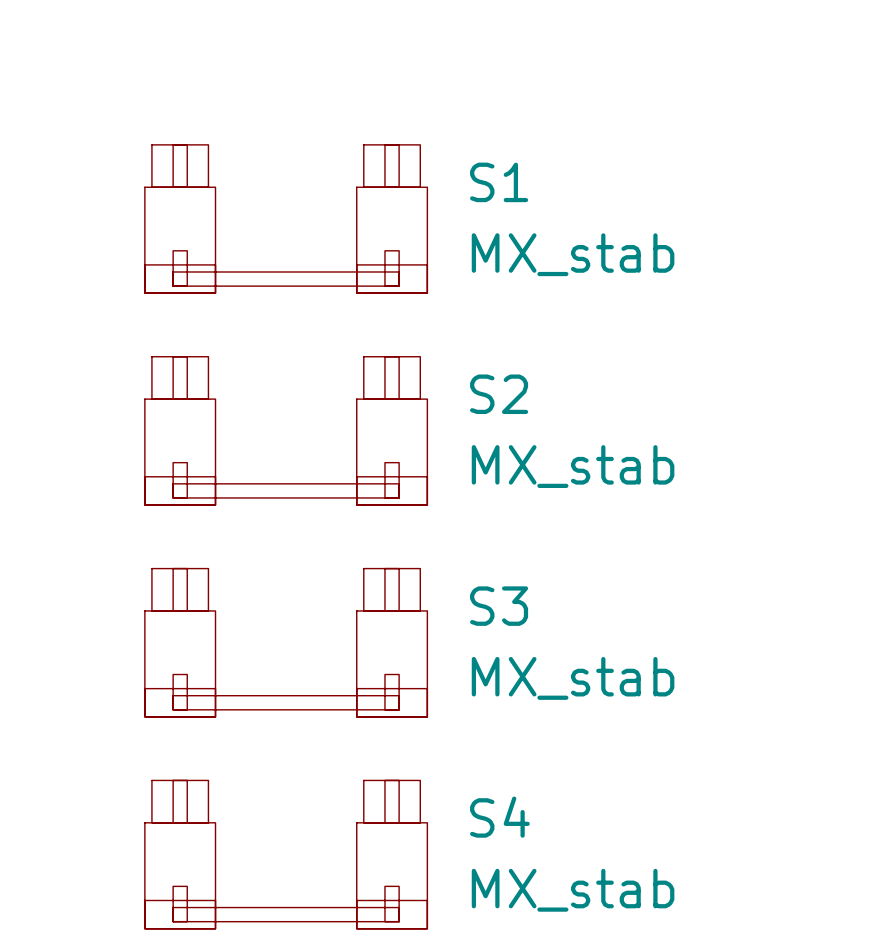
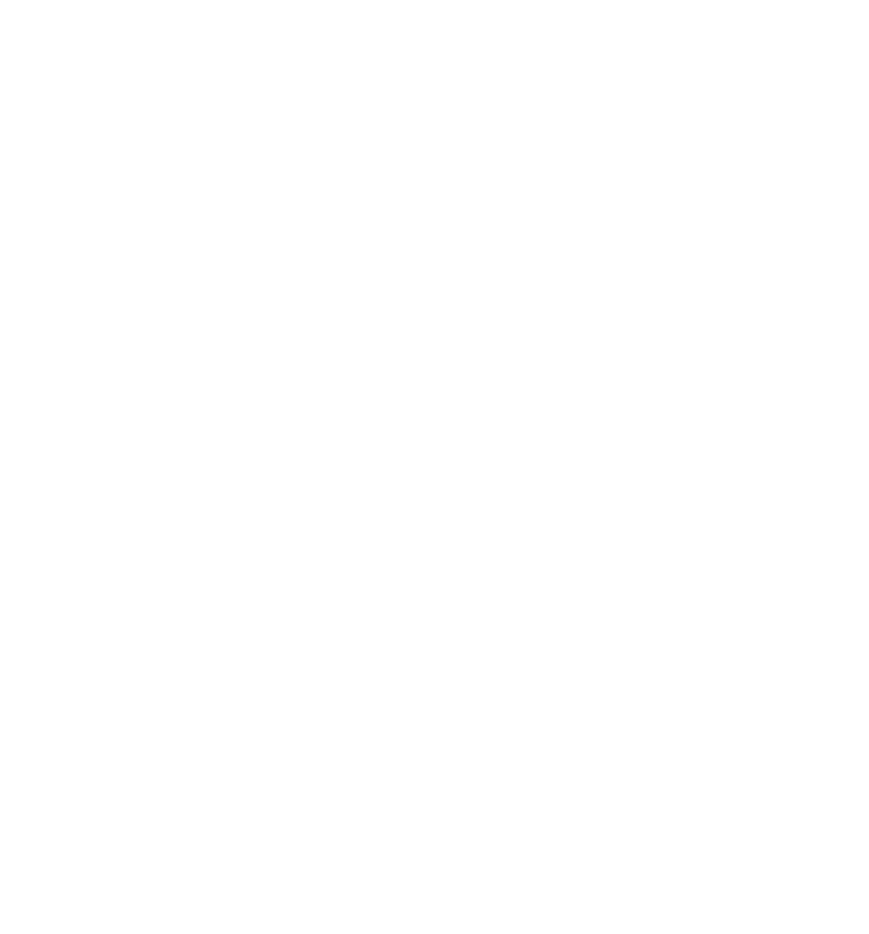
S1: MX_stab (286, 219) -> none
S2: MX_stab (286, 430) -> none
S3: MX_stab (286, 642) -> none
S4: MX_stab (286, 854) -> none

